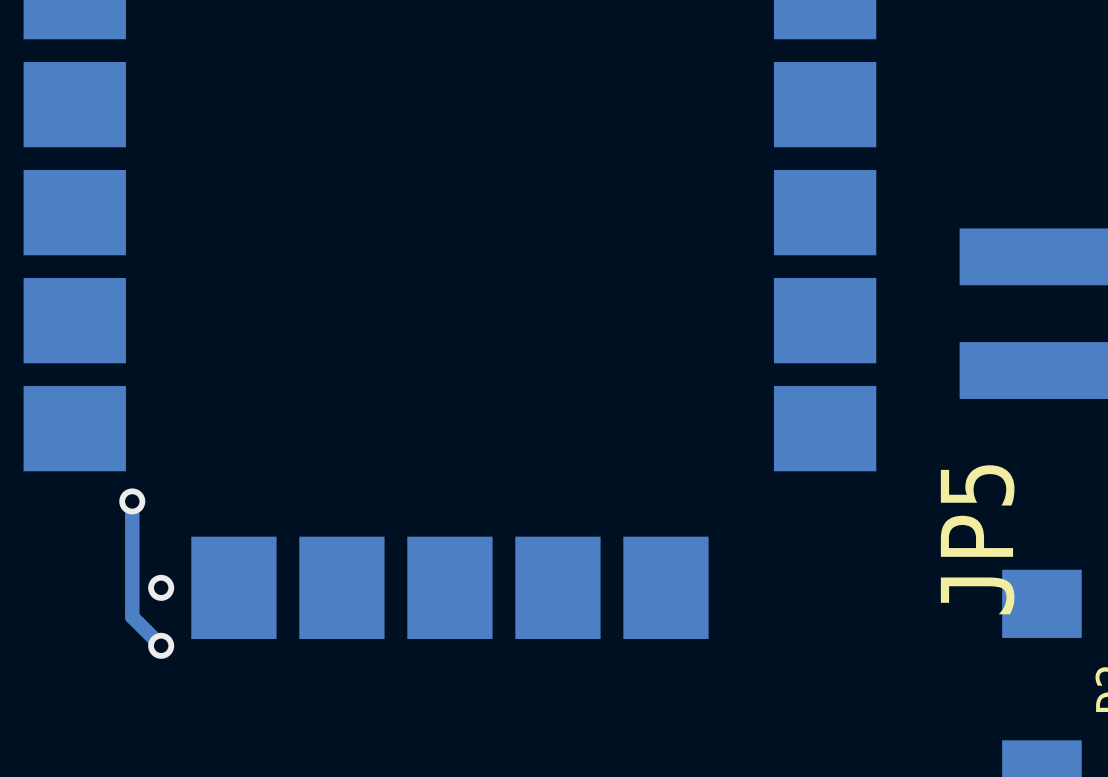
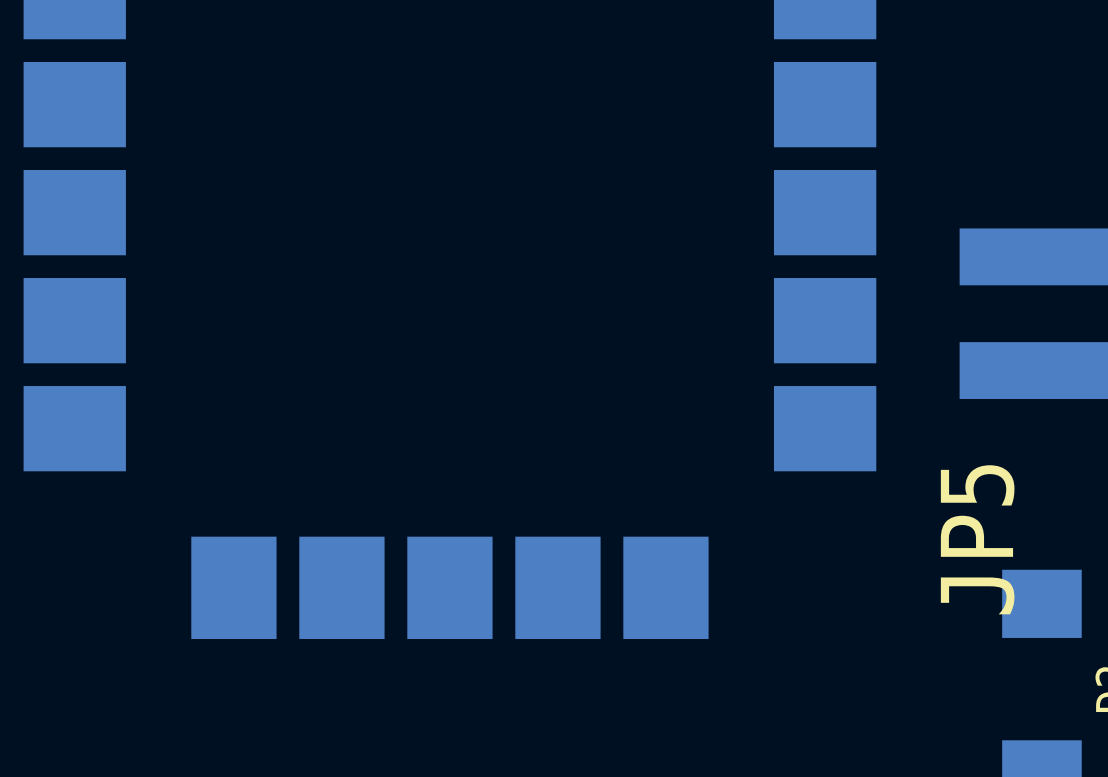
track: (132, 501) (132, 616) (161, 645) -> none
via: (132, 501) -> none
via: (161, 587) -> none
via: (161, 645) -> none

